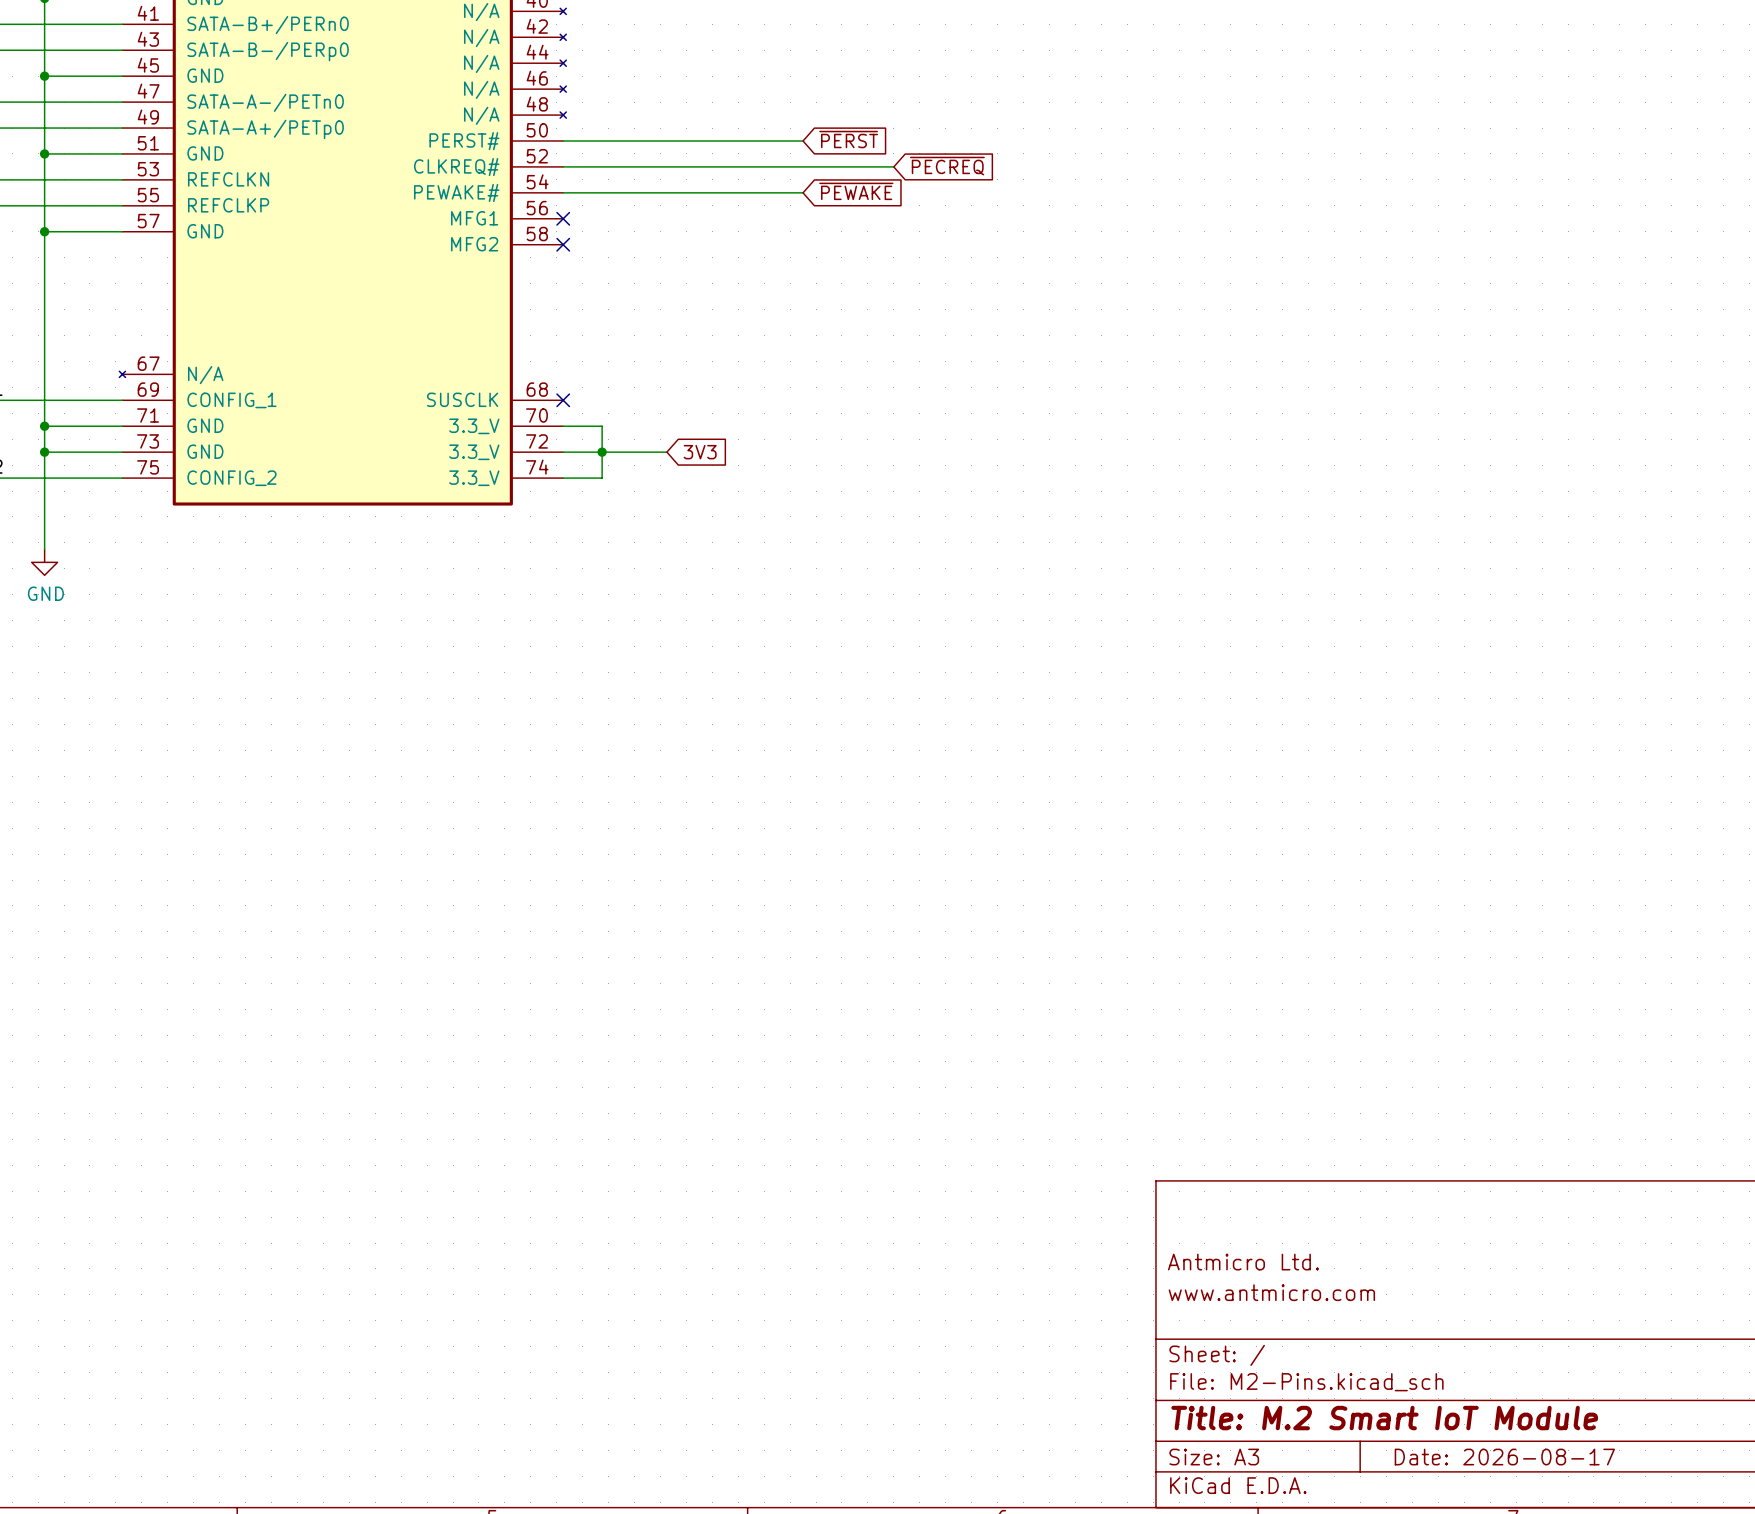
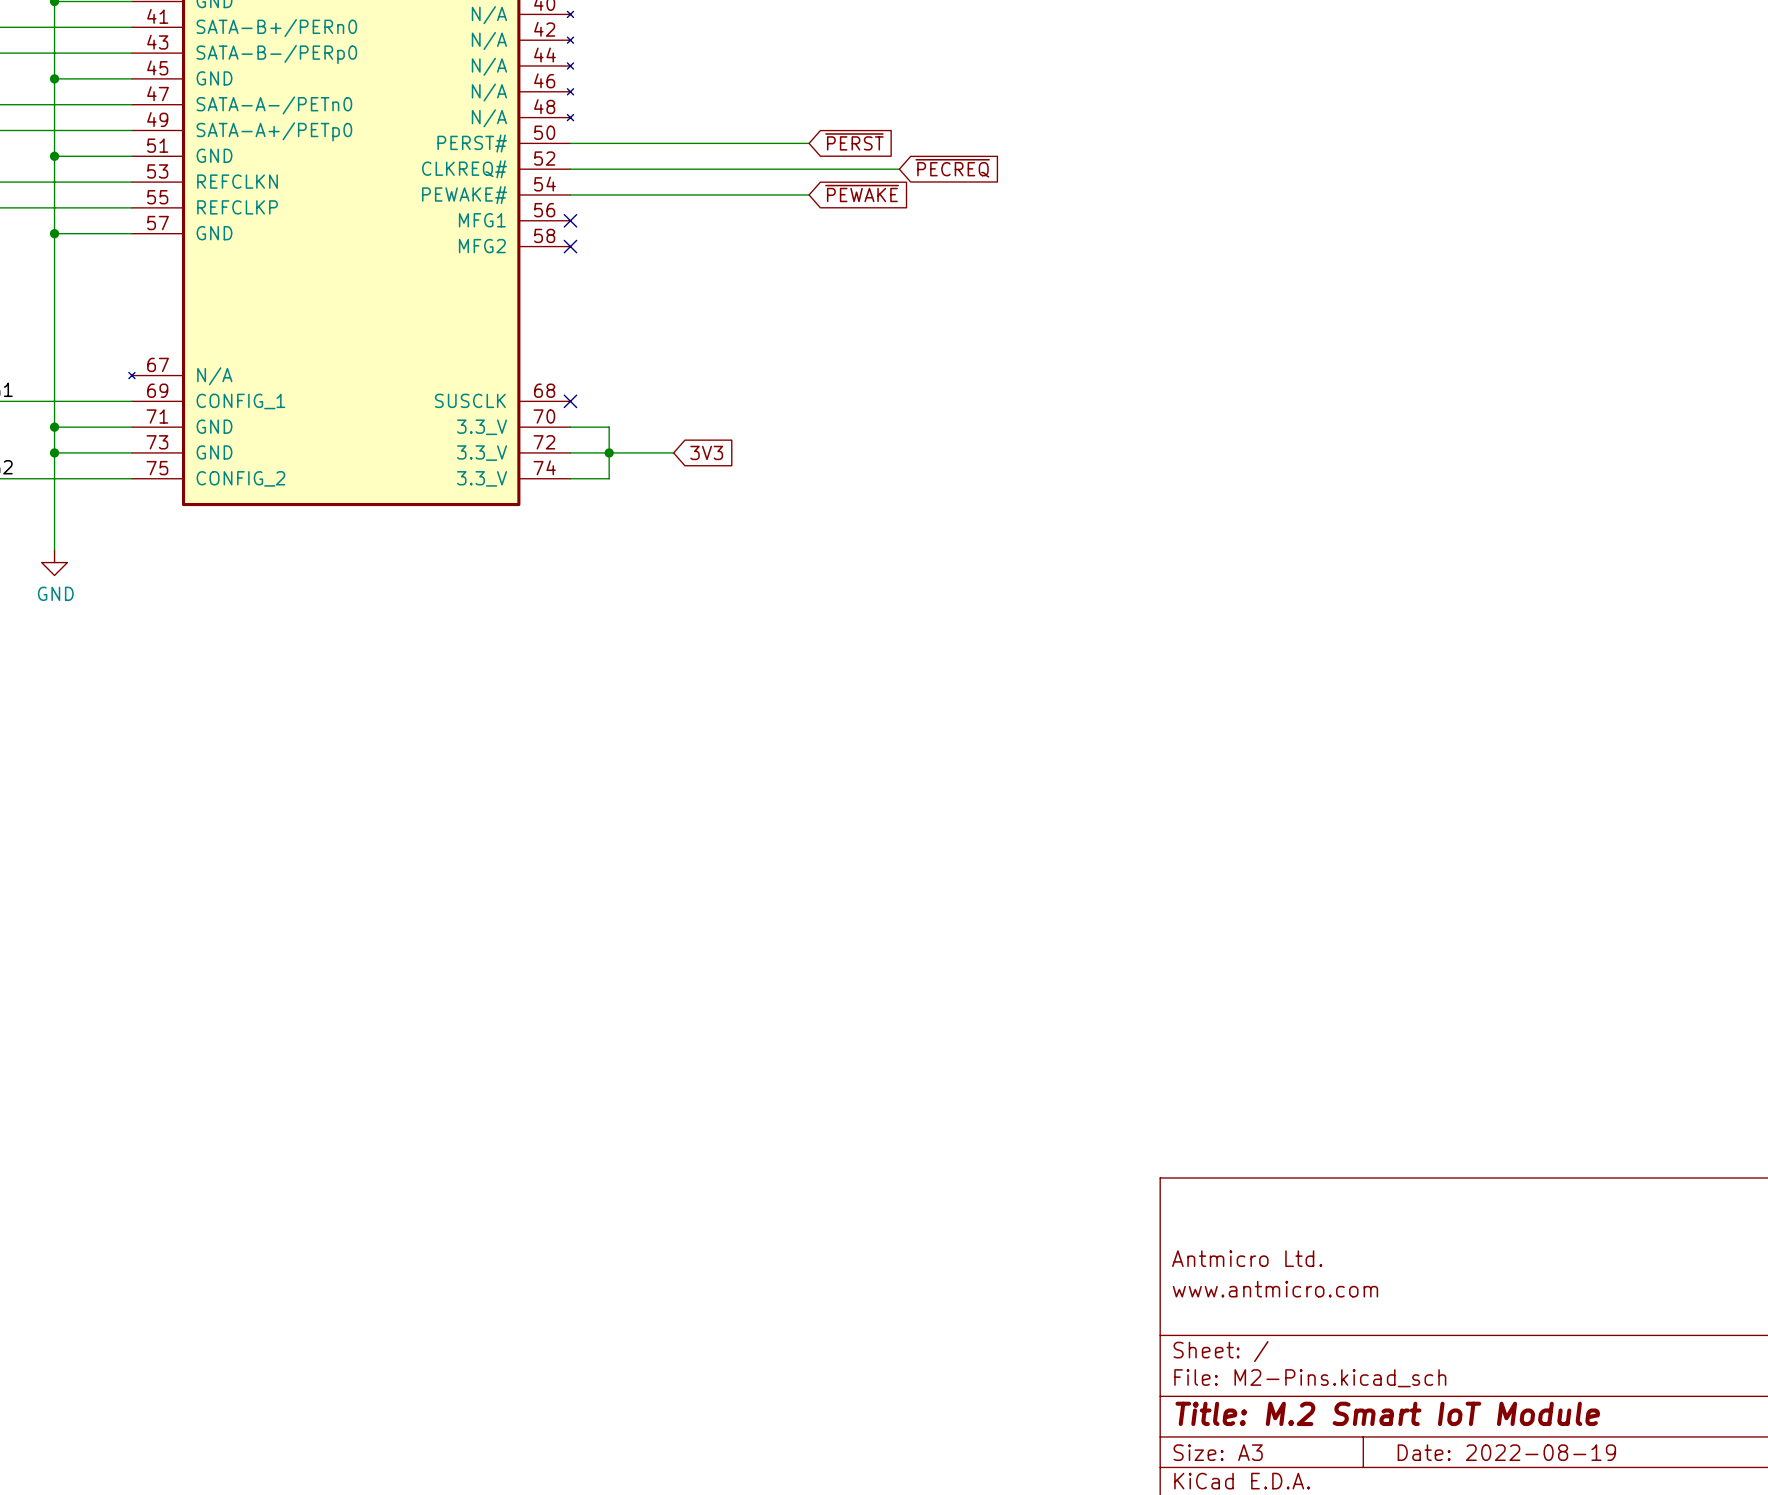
title block: Date: 2026-08-17 (1504, 1457) -> Date: 2022-08-19 (1506, 1452)

